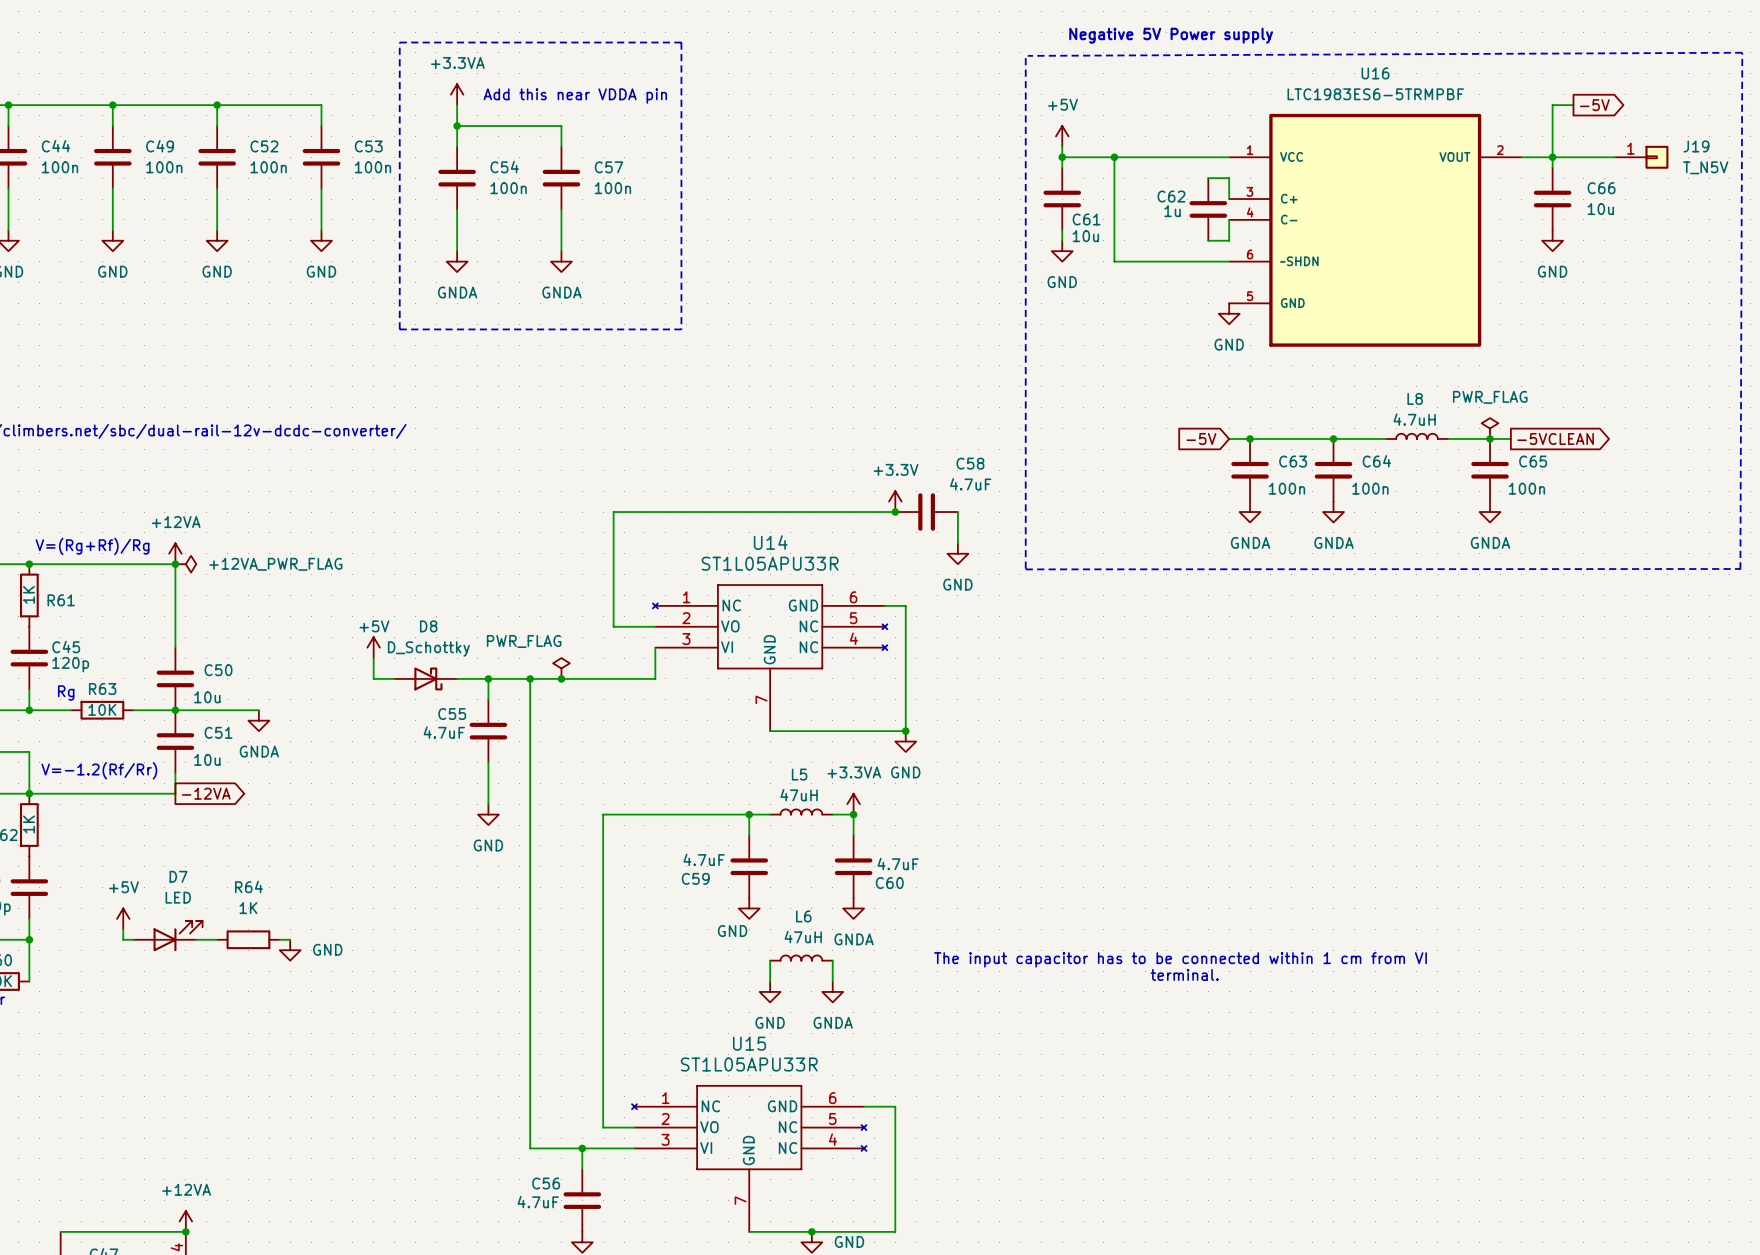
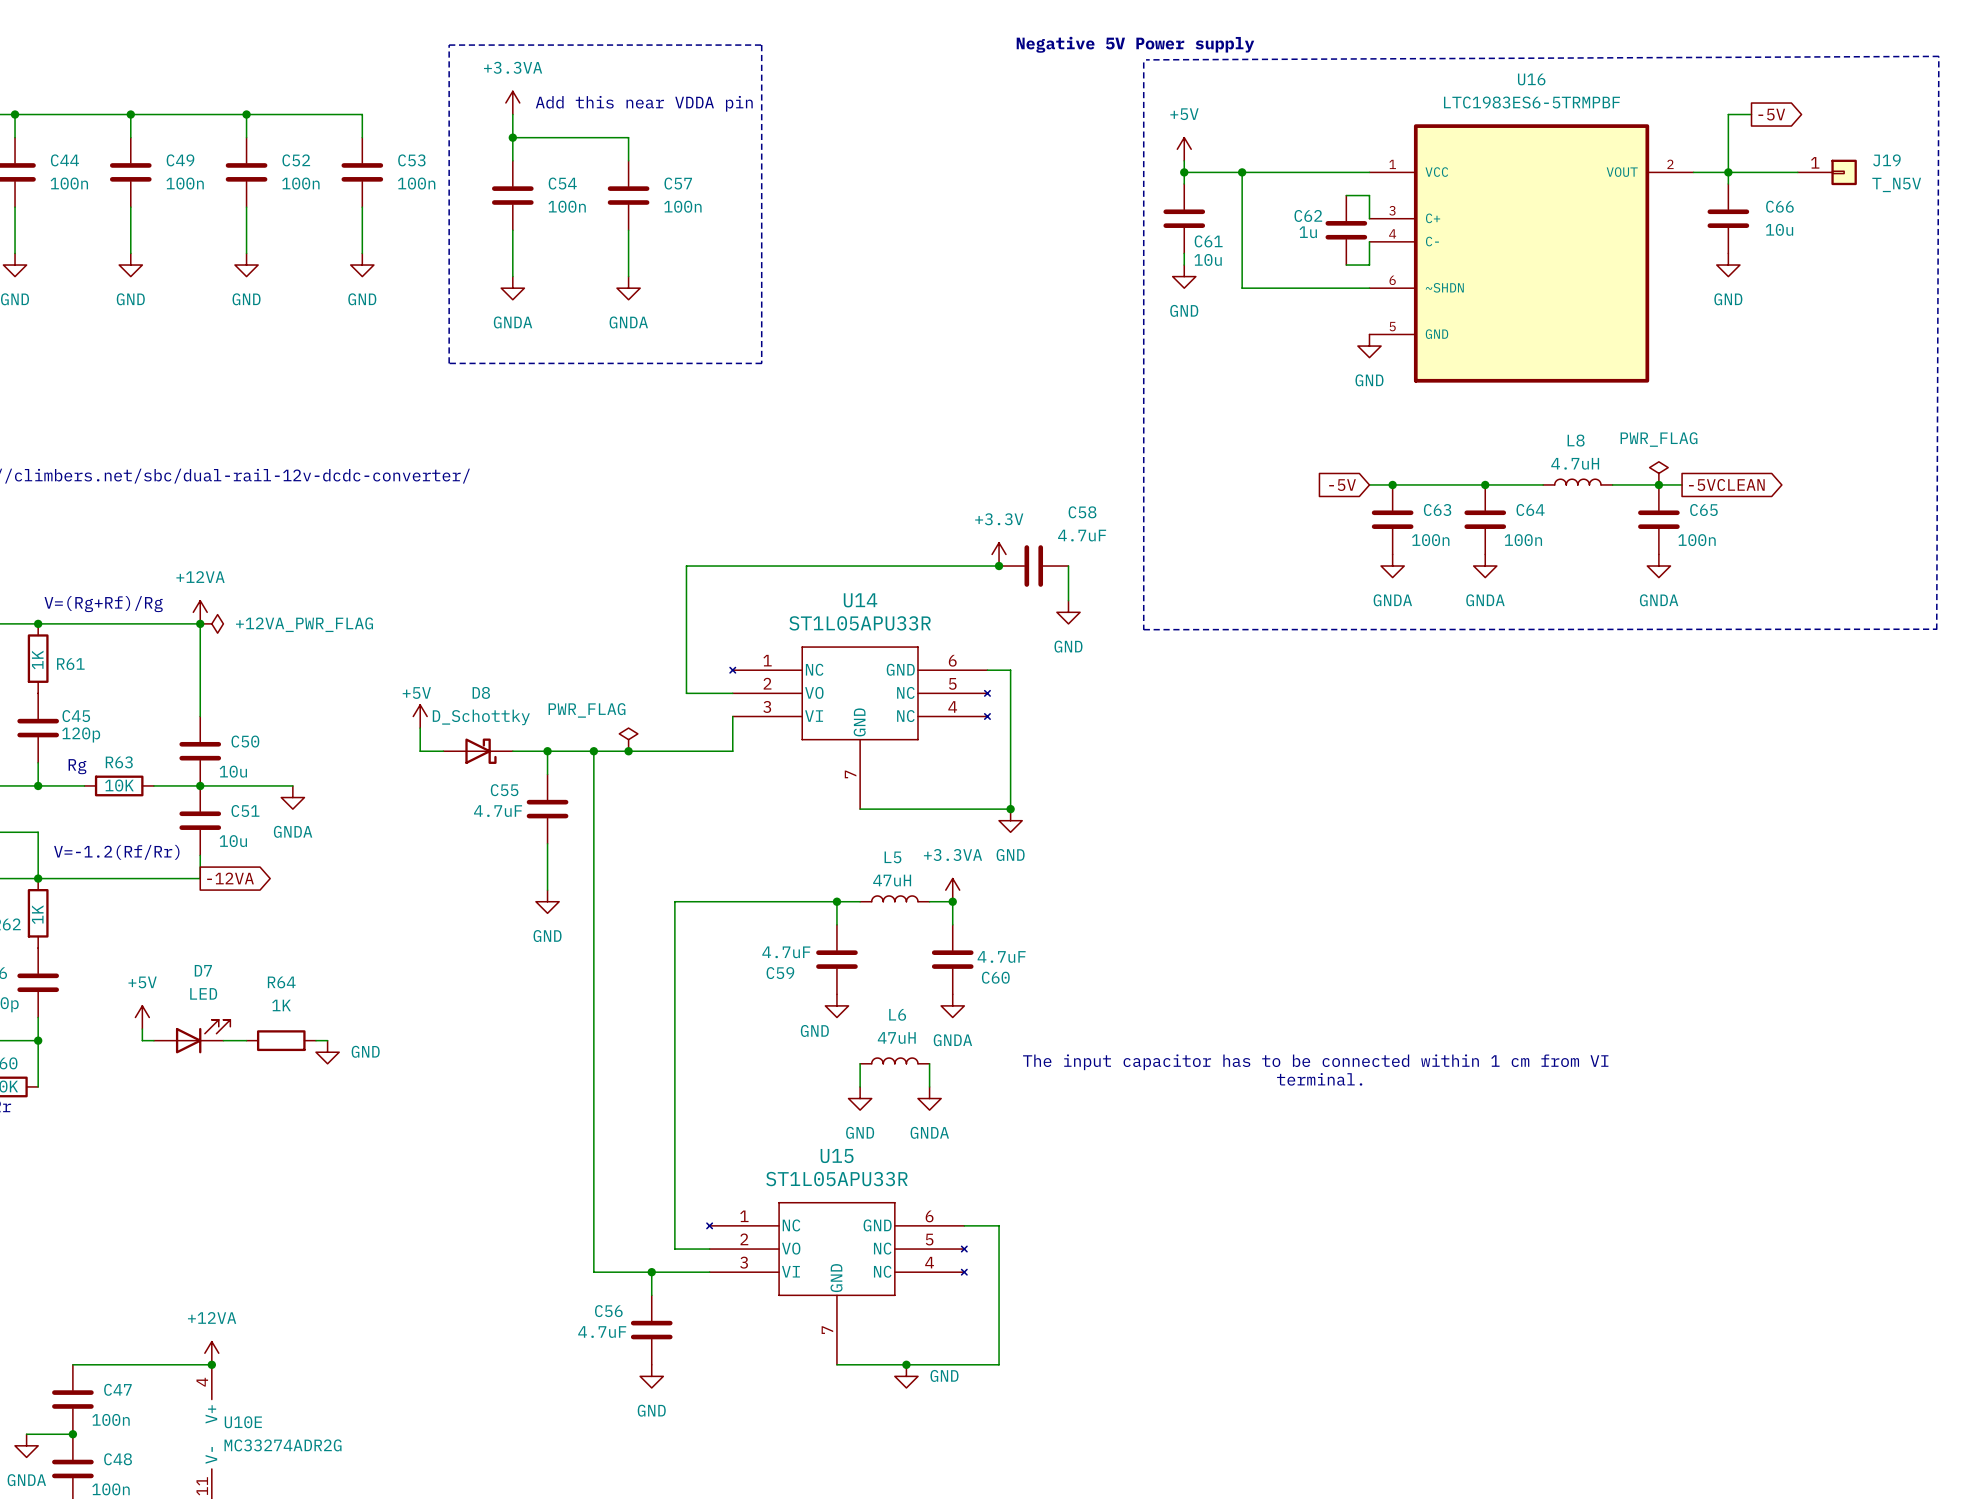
text position: Negative 5V Power supply (1171, 35) -> Negative 5V Power supply (1135, 44)

